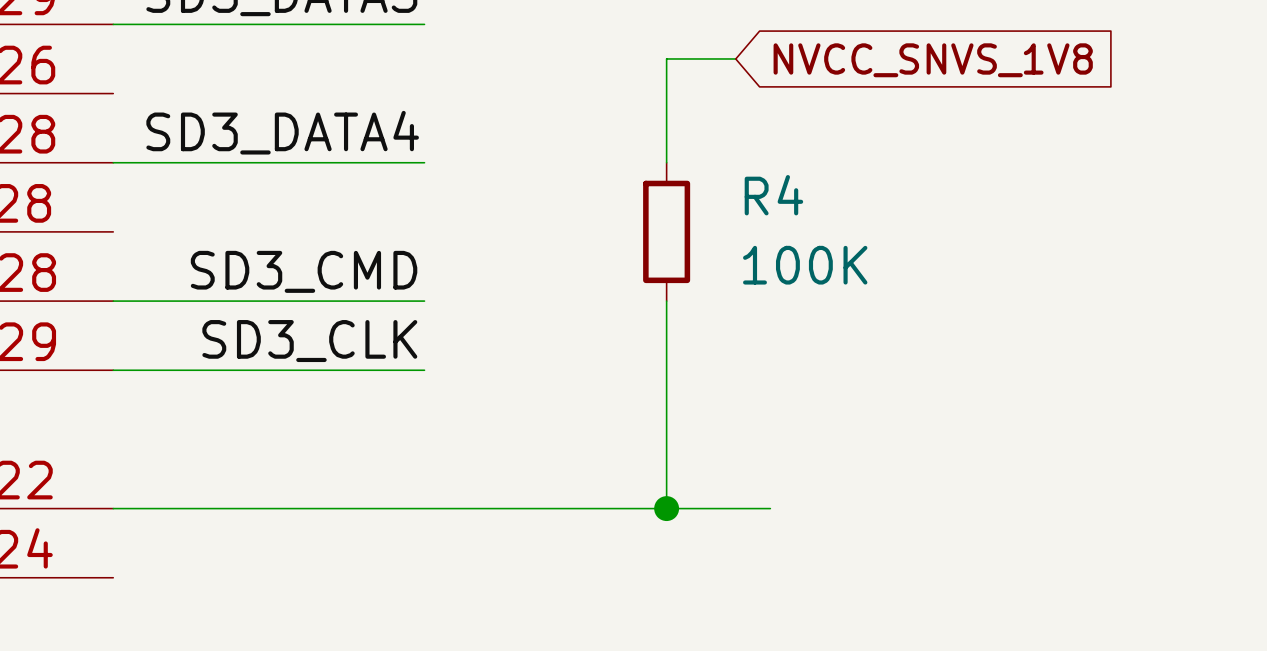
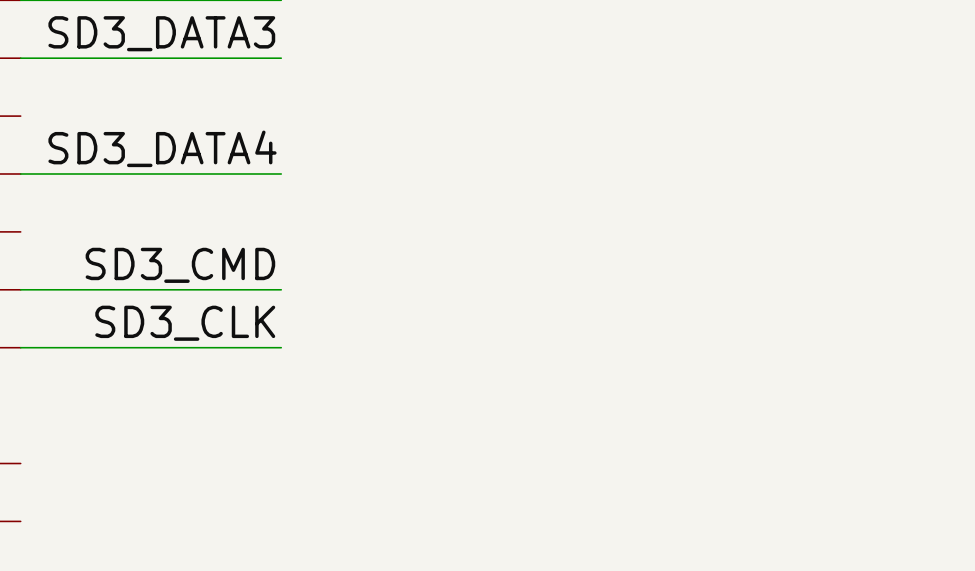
wire: (735, 58) (666, 58) (666, 162) -> none
global label: NVCC_SNVS_1V8 (933, 60) -> none
R4: 100K (666, 231) -> none
wire: (666, 301) (666, 508) -> none
wire: (113, 508) (770, 508) -> none
junction: (666, 508) -> none

